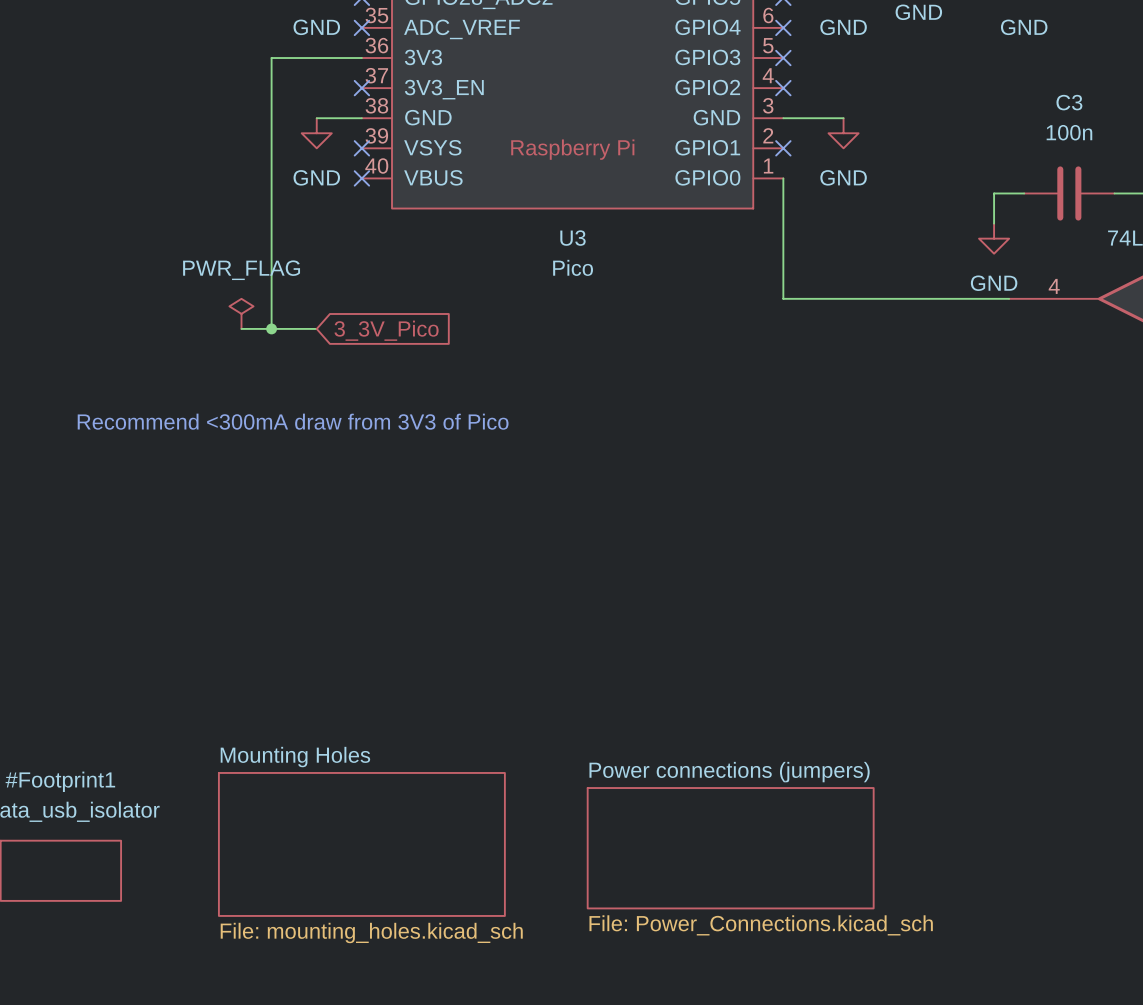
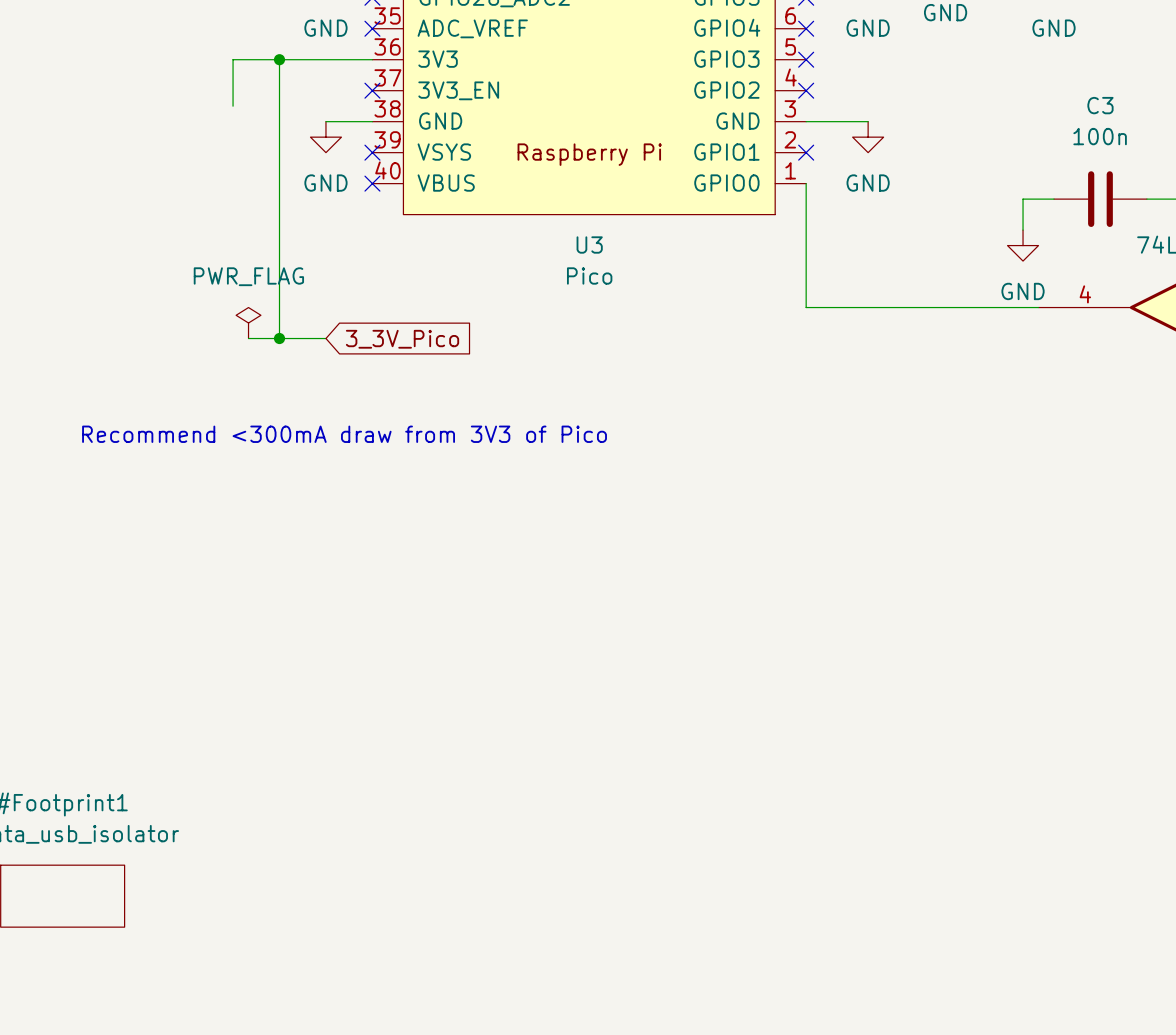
wire: none -> (279, 59) (233, 59) (233, 106)
junction: none -> (279, 59)
sheet Mounting Holes: File: mounting_holes.kicad_sch (361, 844) -> none
sheet Power connections (jumpers): File: Power_Connections.kicad_sch (730, 848) -> none

